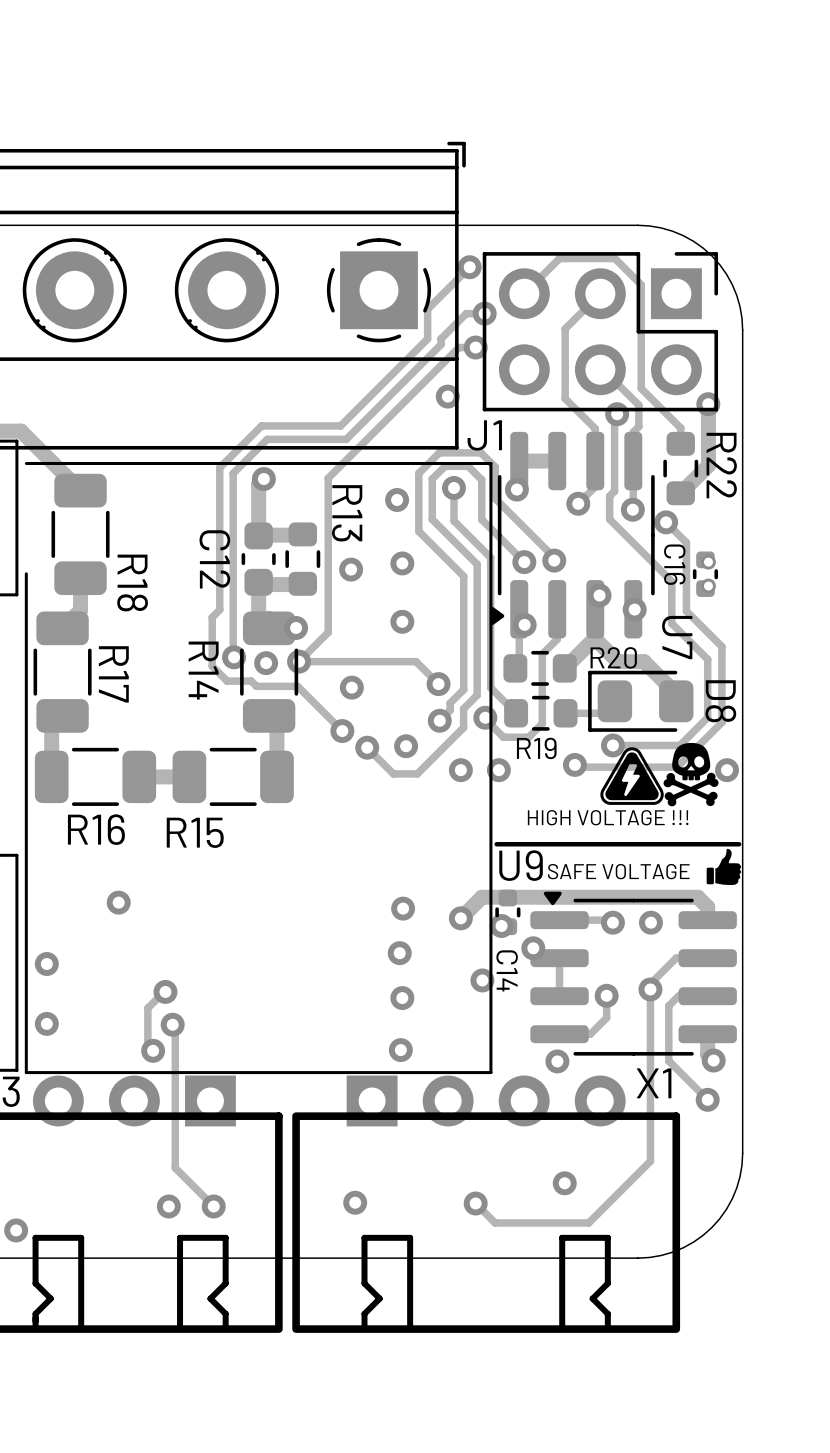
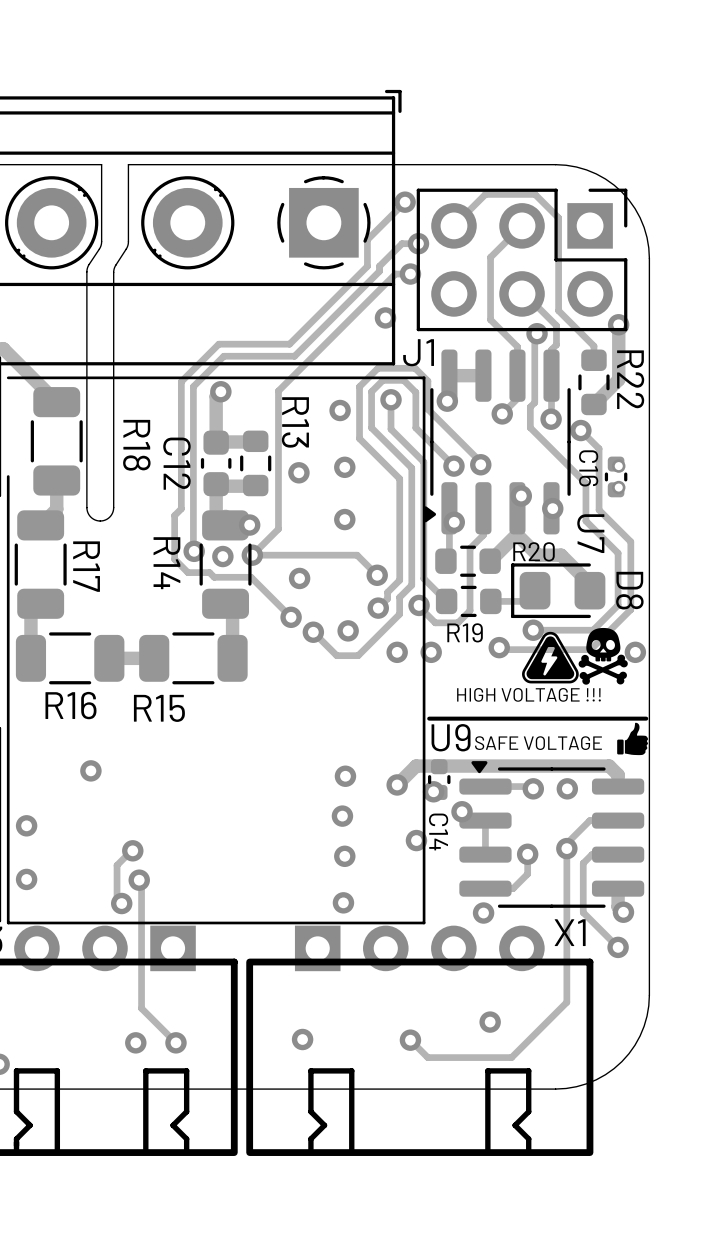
board edge: (160, 225) (130, 225) -> (128, 164) (128, 243) (113, 272) (113, 509) (108, 518) (100, 521) (90, 517) (86, 507) (86, 271) (101, 242) (101, 164)
R18 name position: R18 (132, 583) -> R18 (136, 445)

